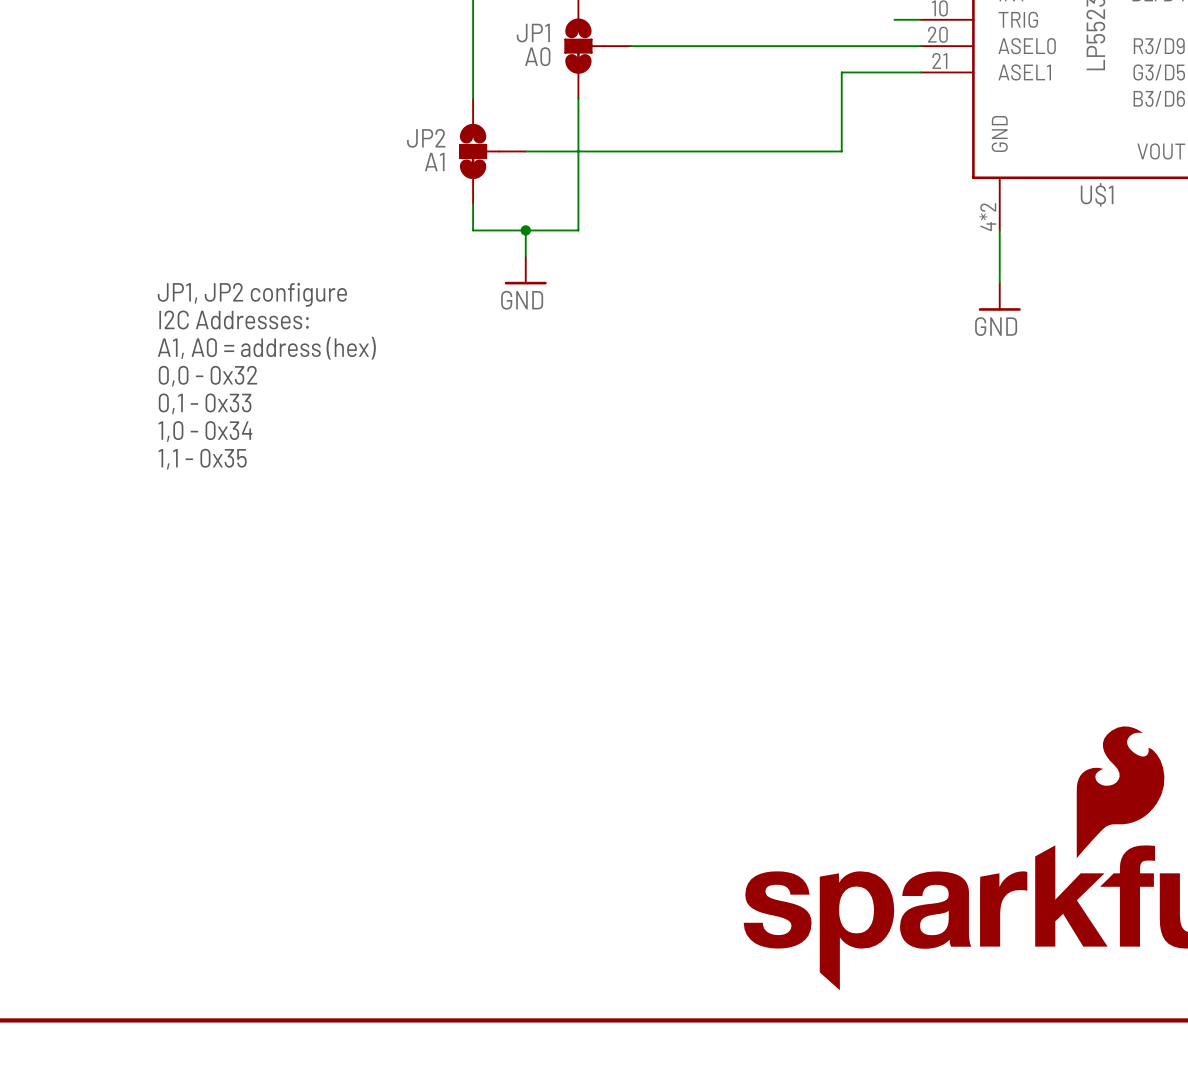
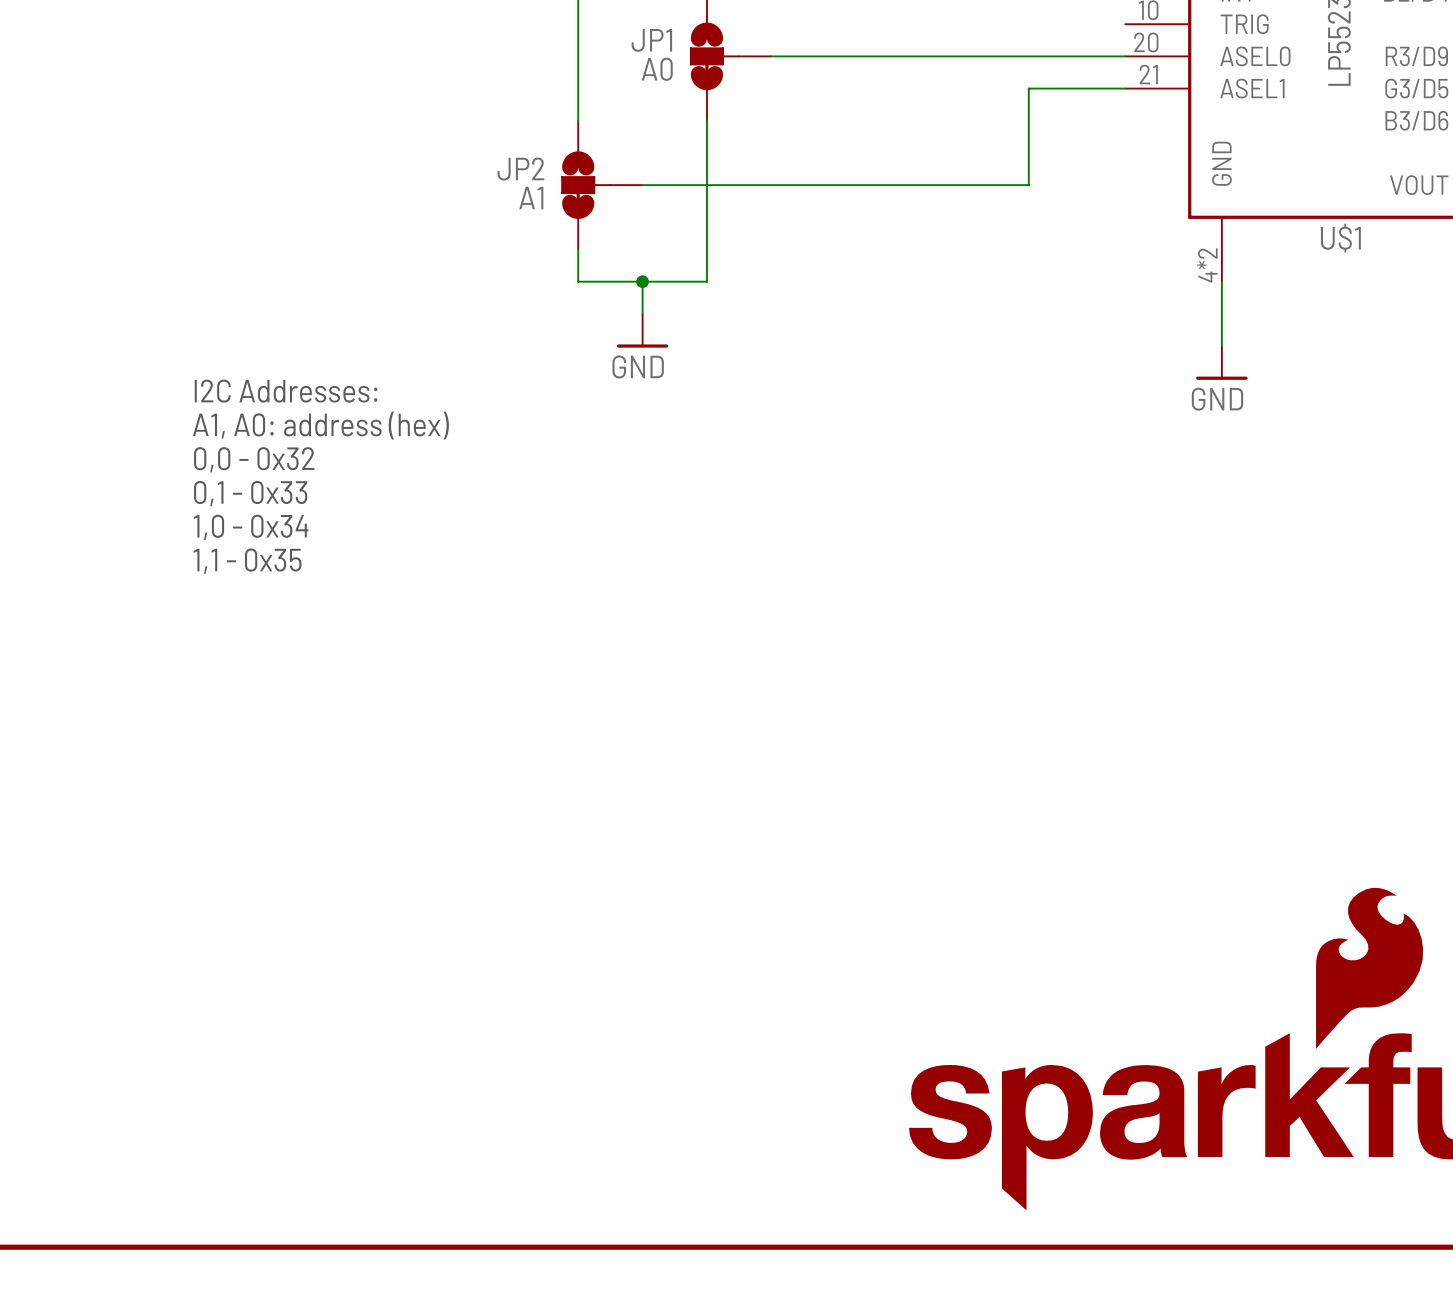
wire: (894, 19) (920, 19) -> none
text: JP1, JP2 configure (252, 294) -> none
text: A1, A0 = address (hex) (266, 348) -> A1, A0: address (hex) (320, 425)

